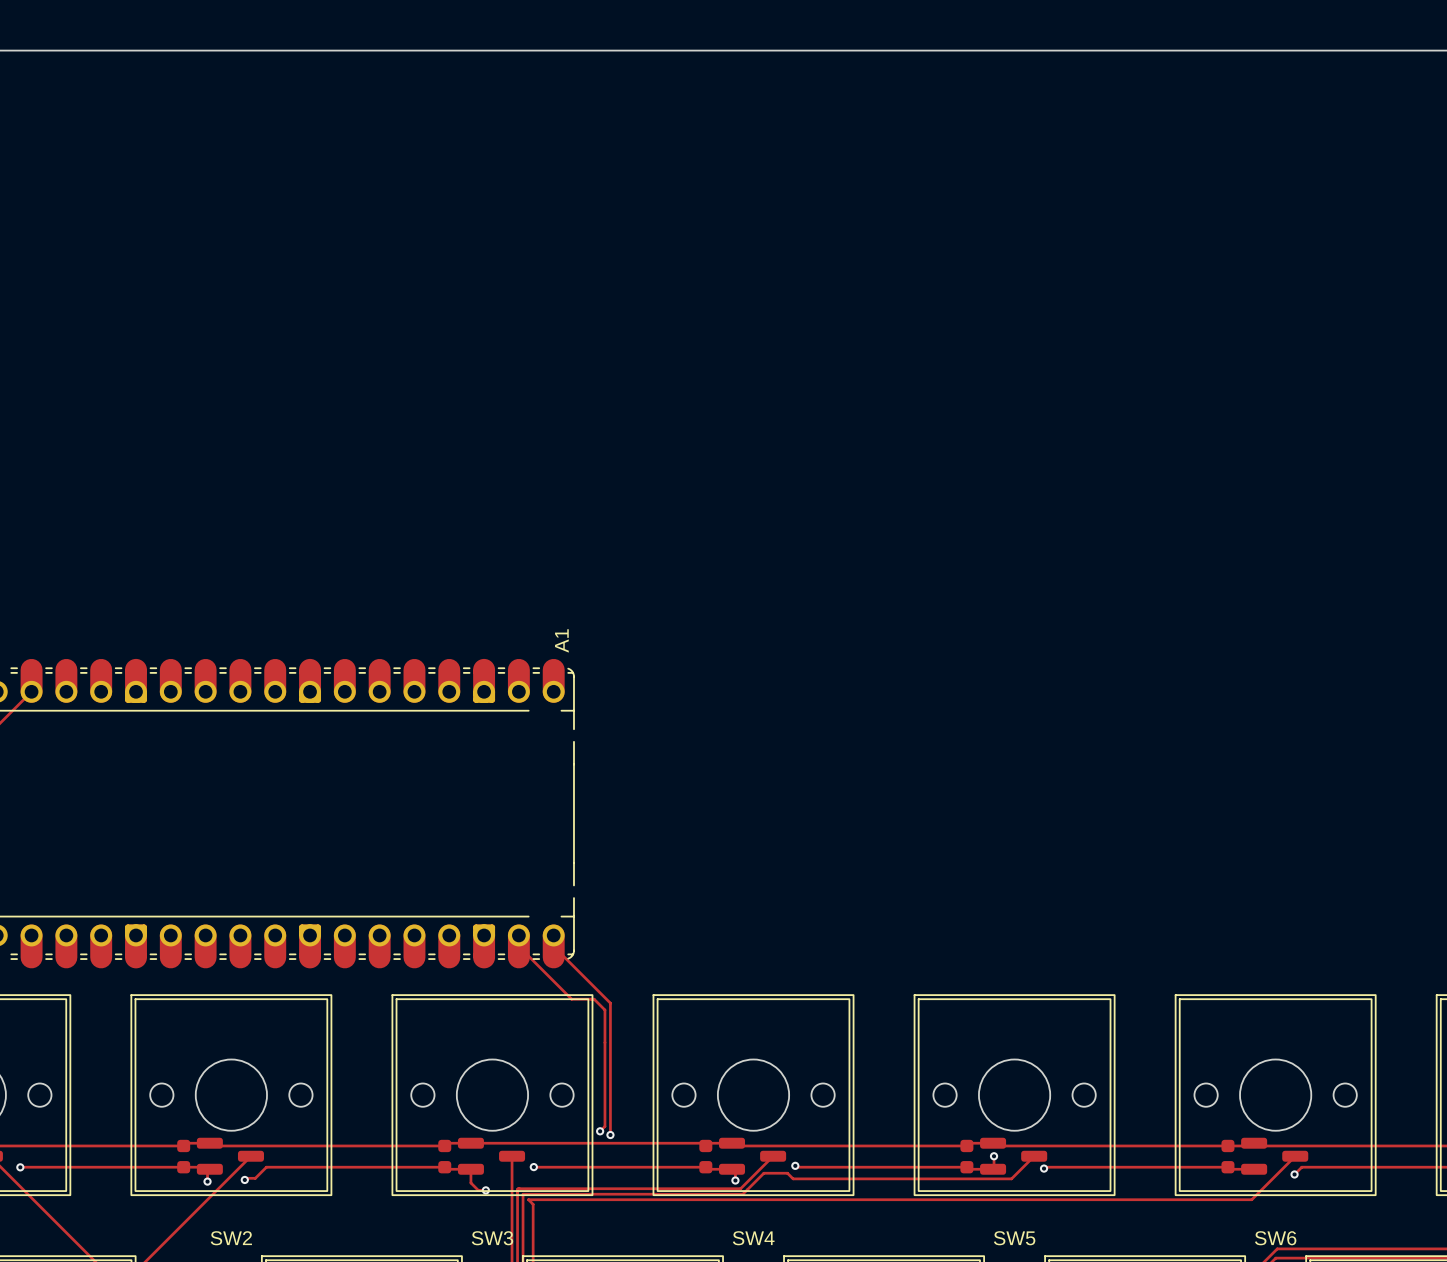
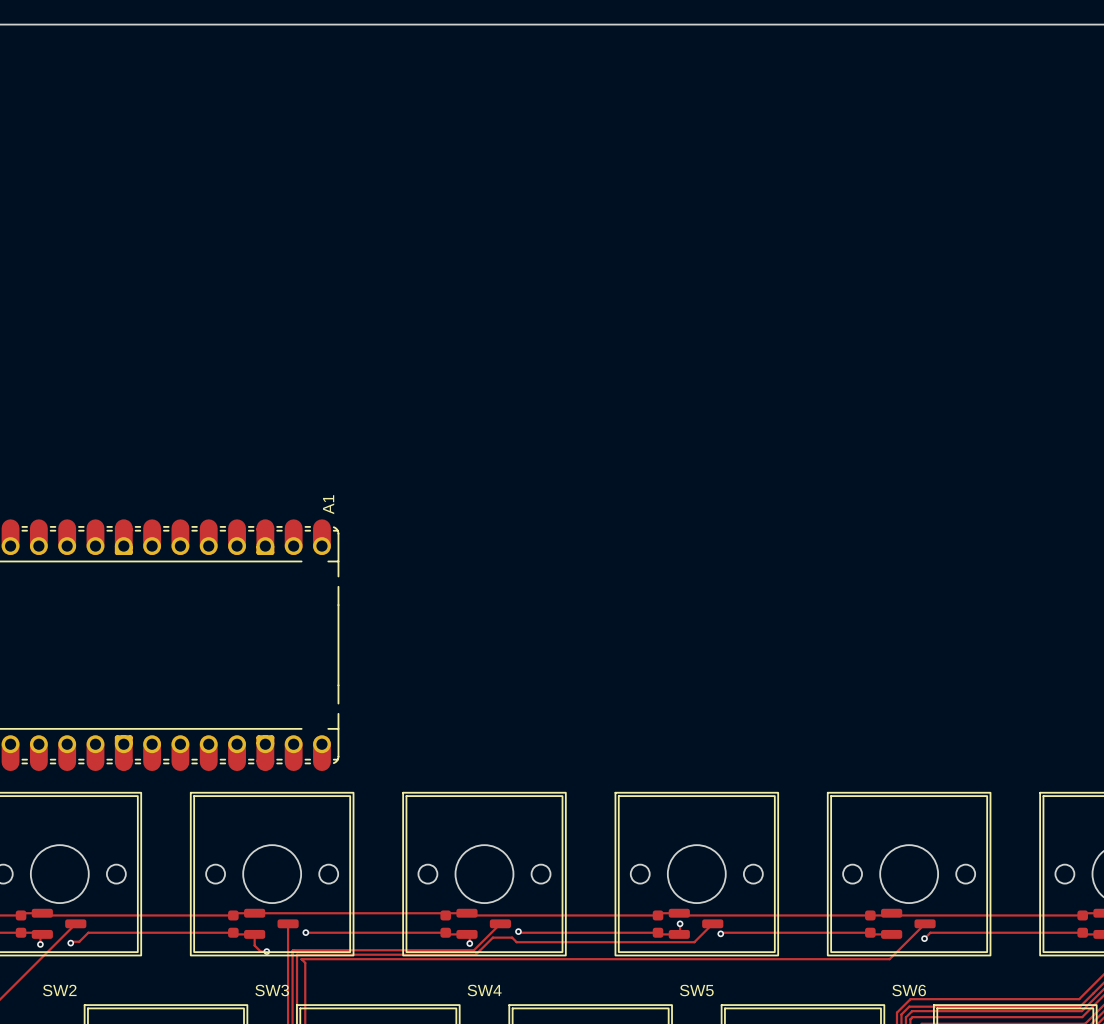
track: (518, 946) (571, 999) (594, 999) (604, 1010) (604, 1126) (600, 1131) -> none
track: (553, 946) (610, 1003) (610, 1135) -> none
via: (600, 1131) -> none
via: (610, 1135) -> none

